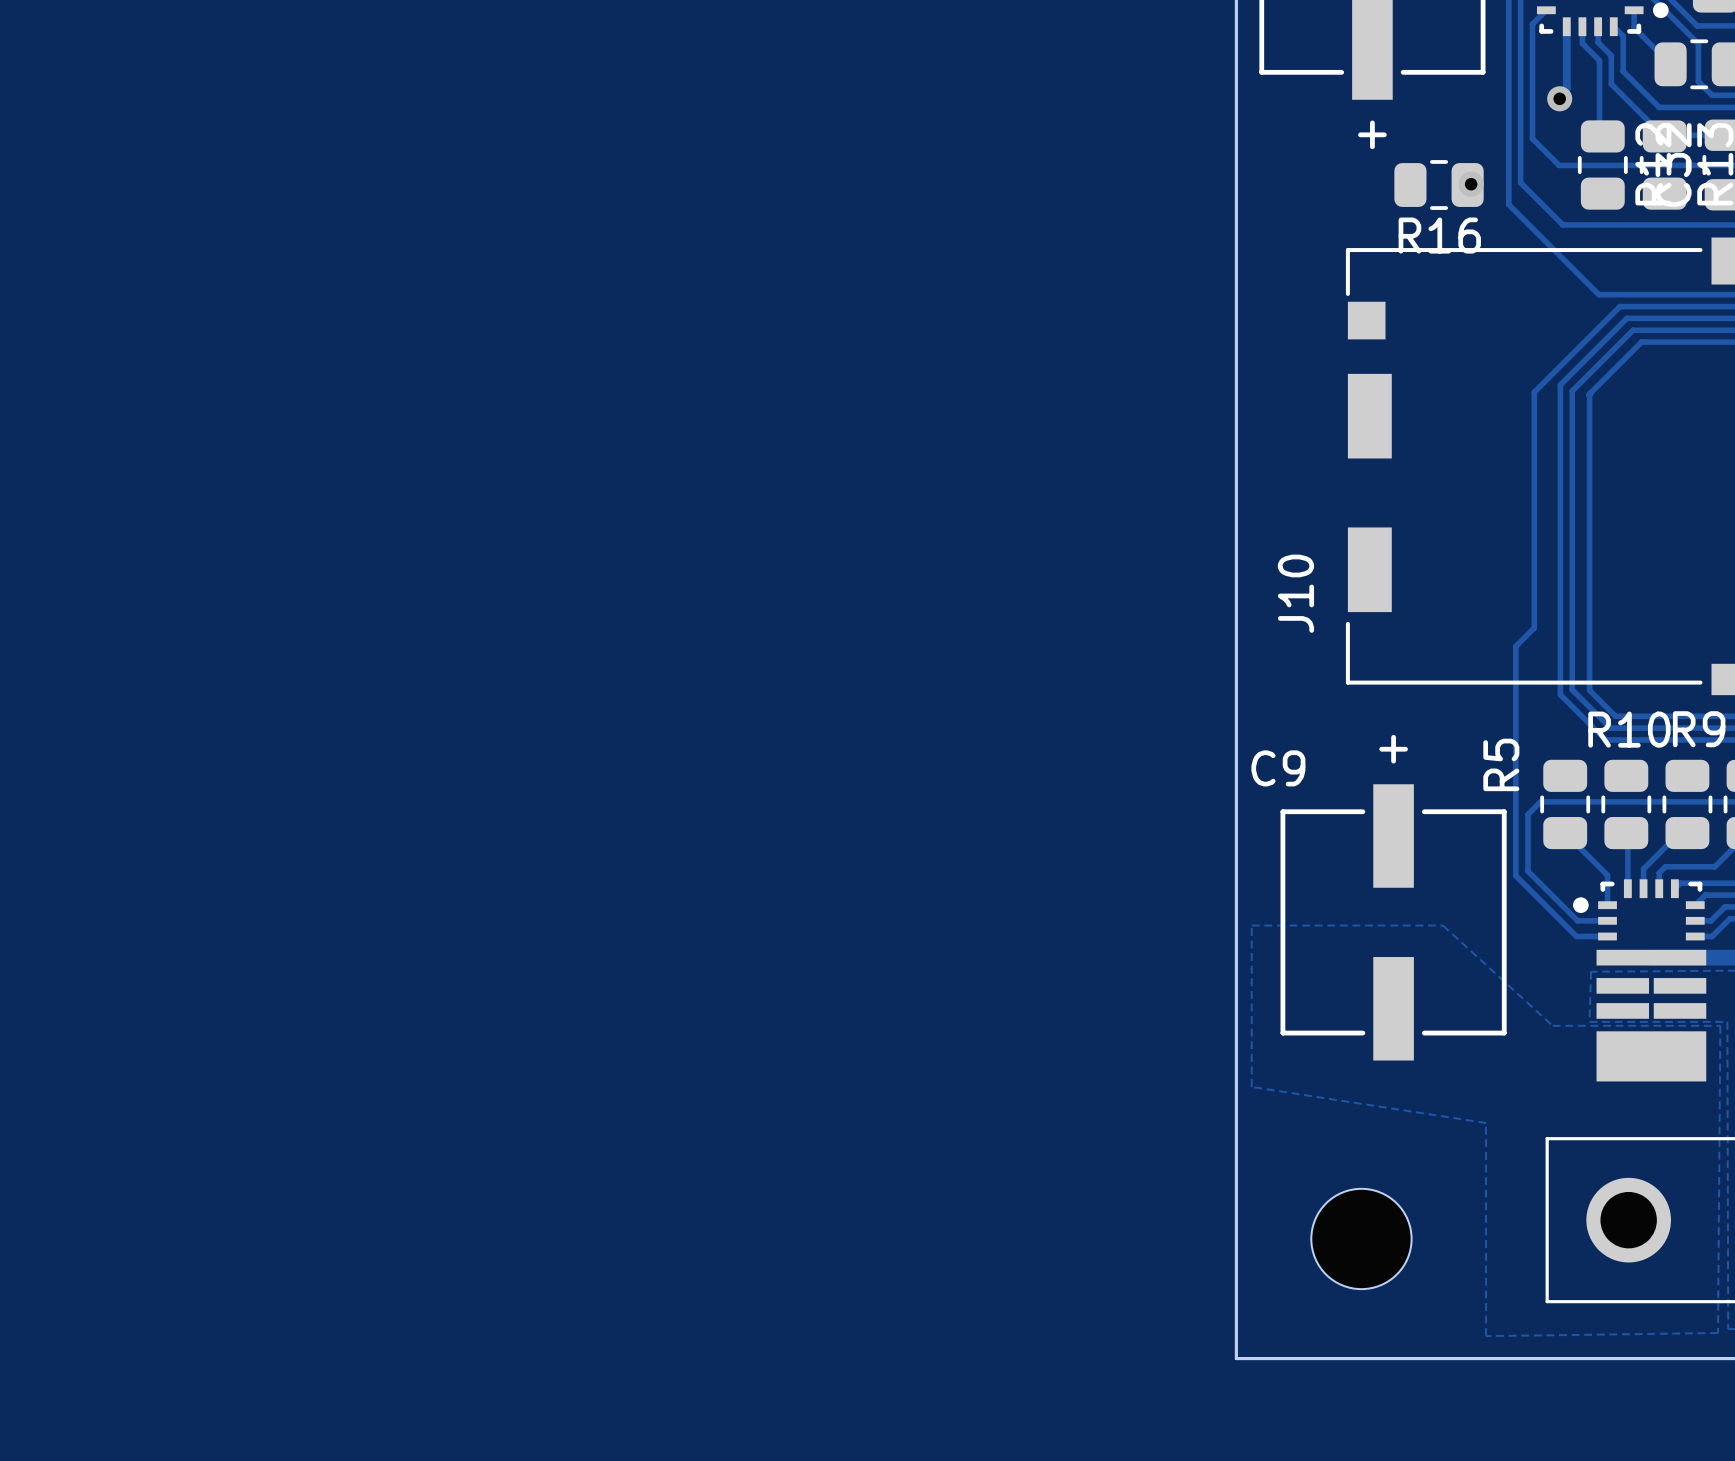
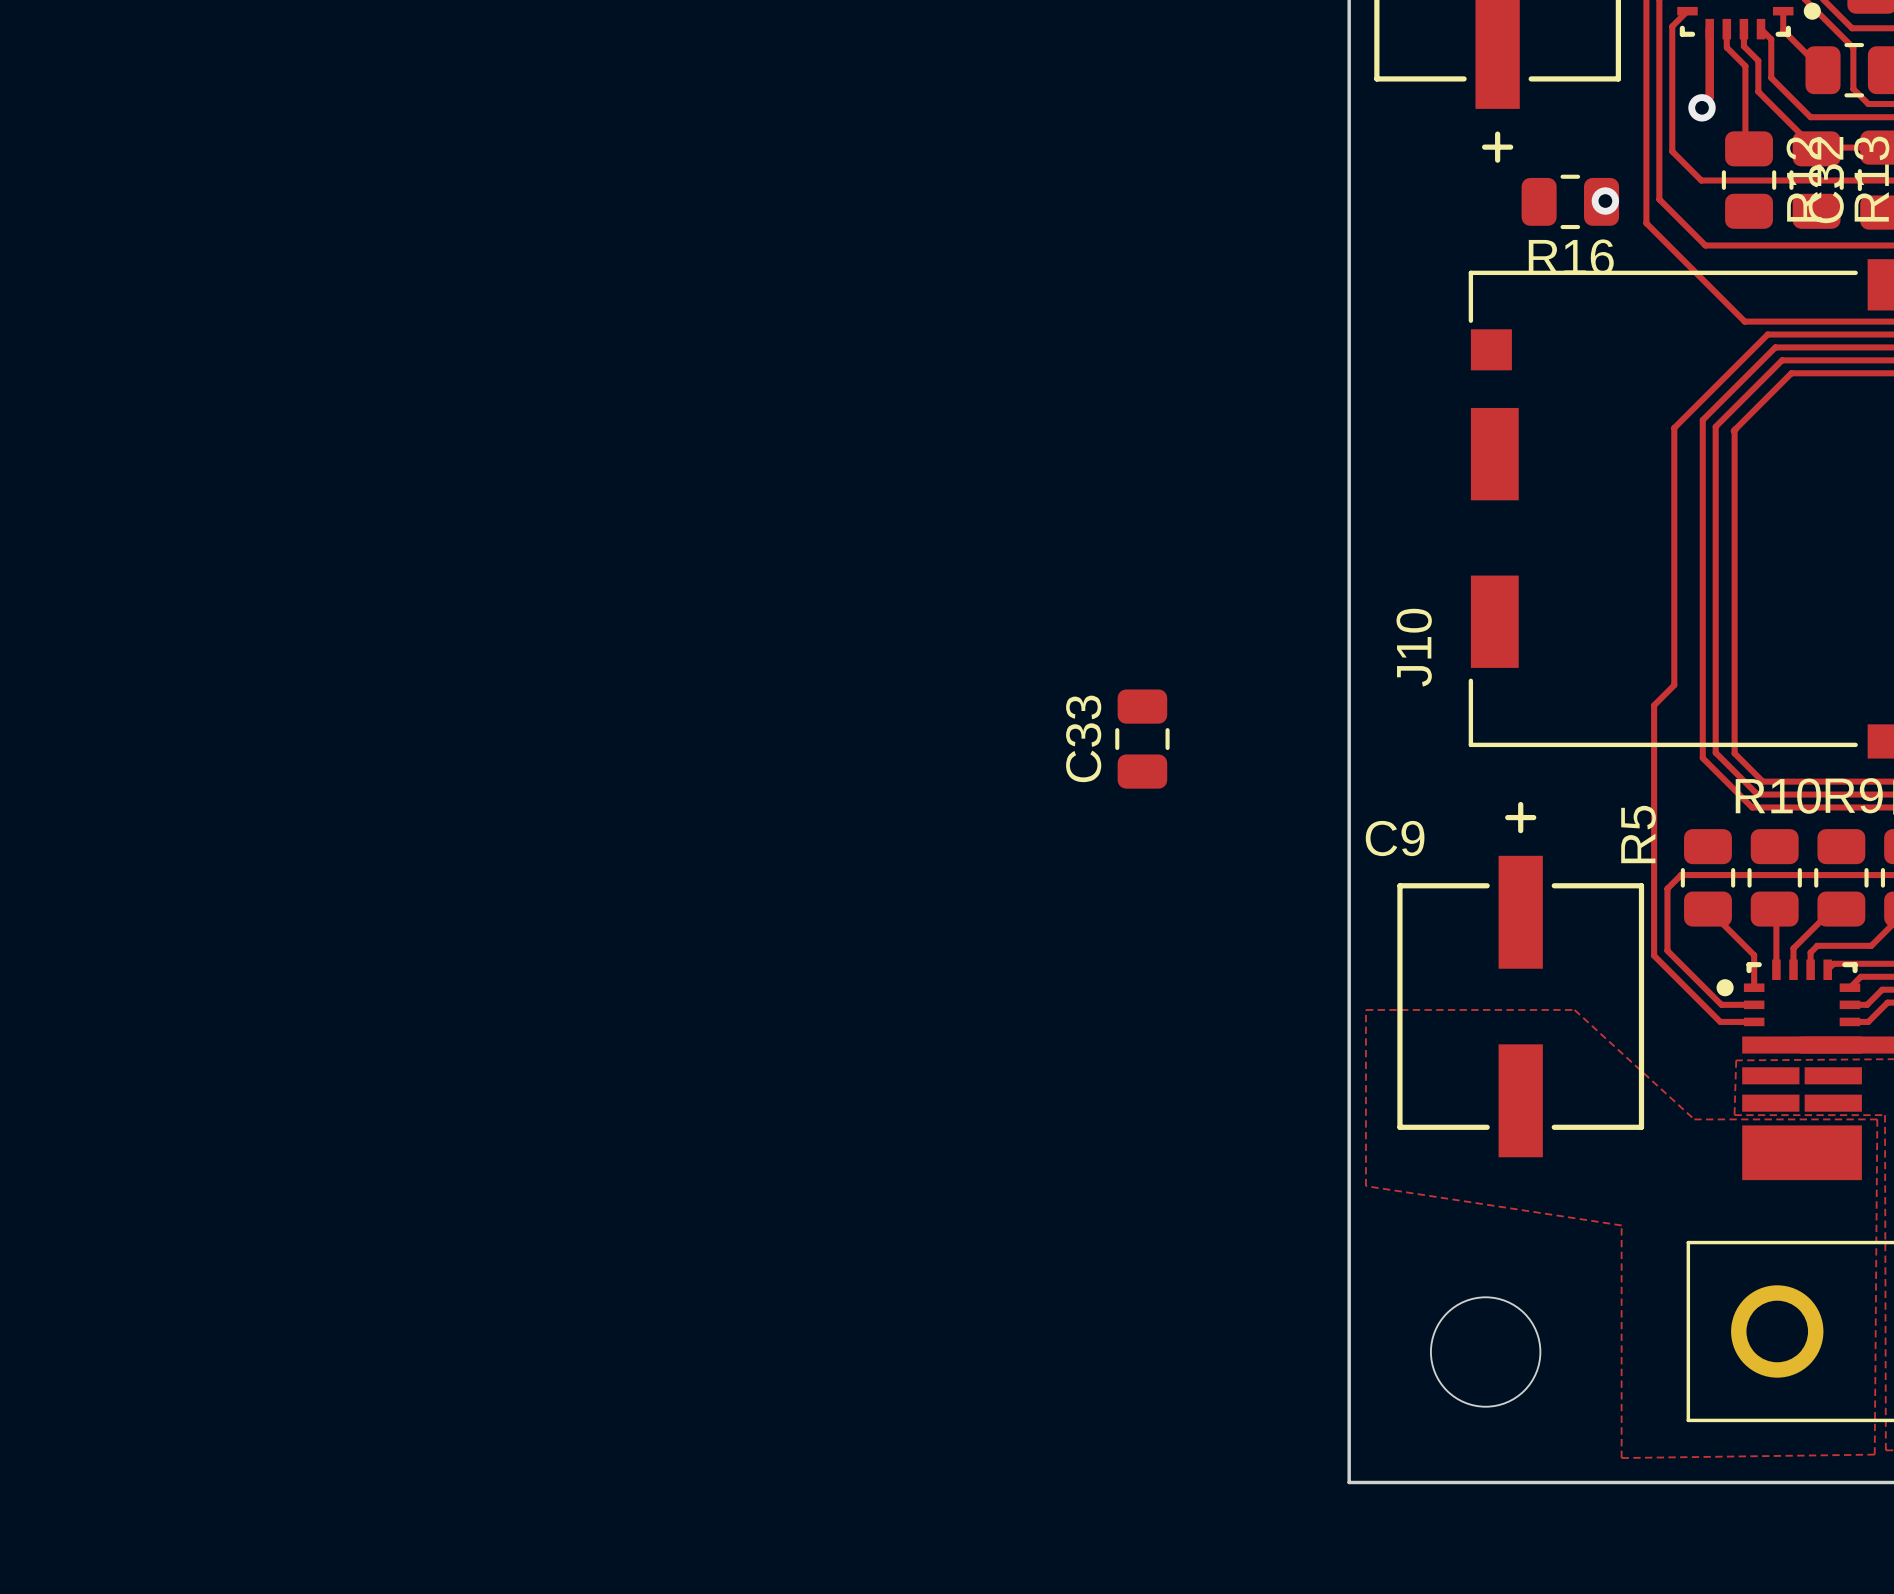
C33: none -> (1142, 739)

